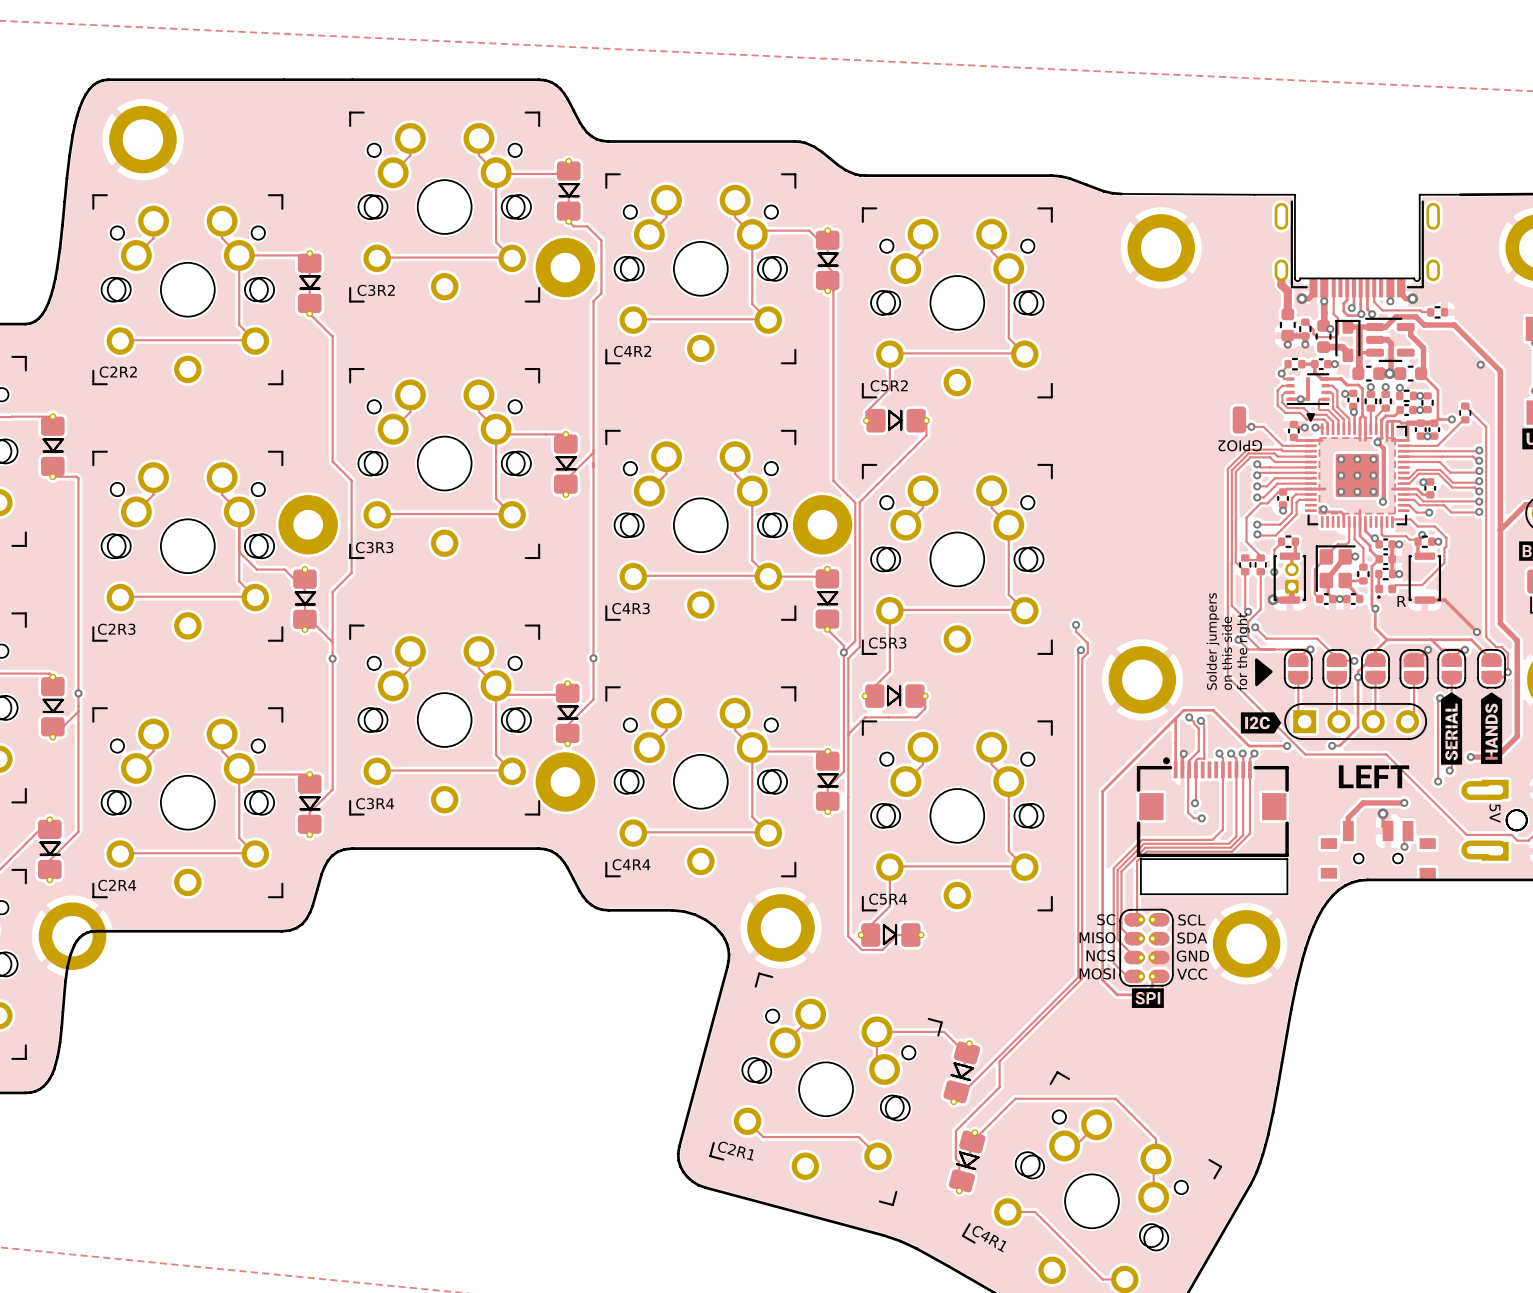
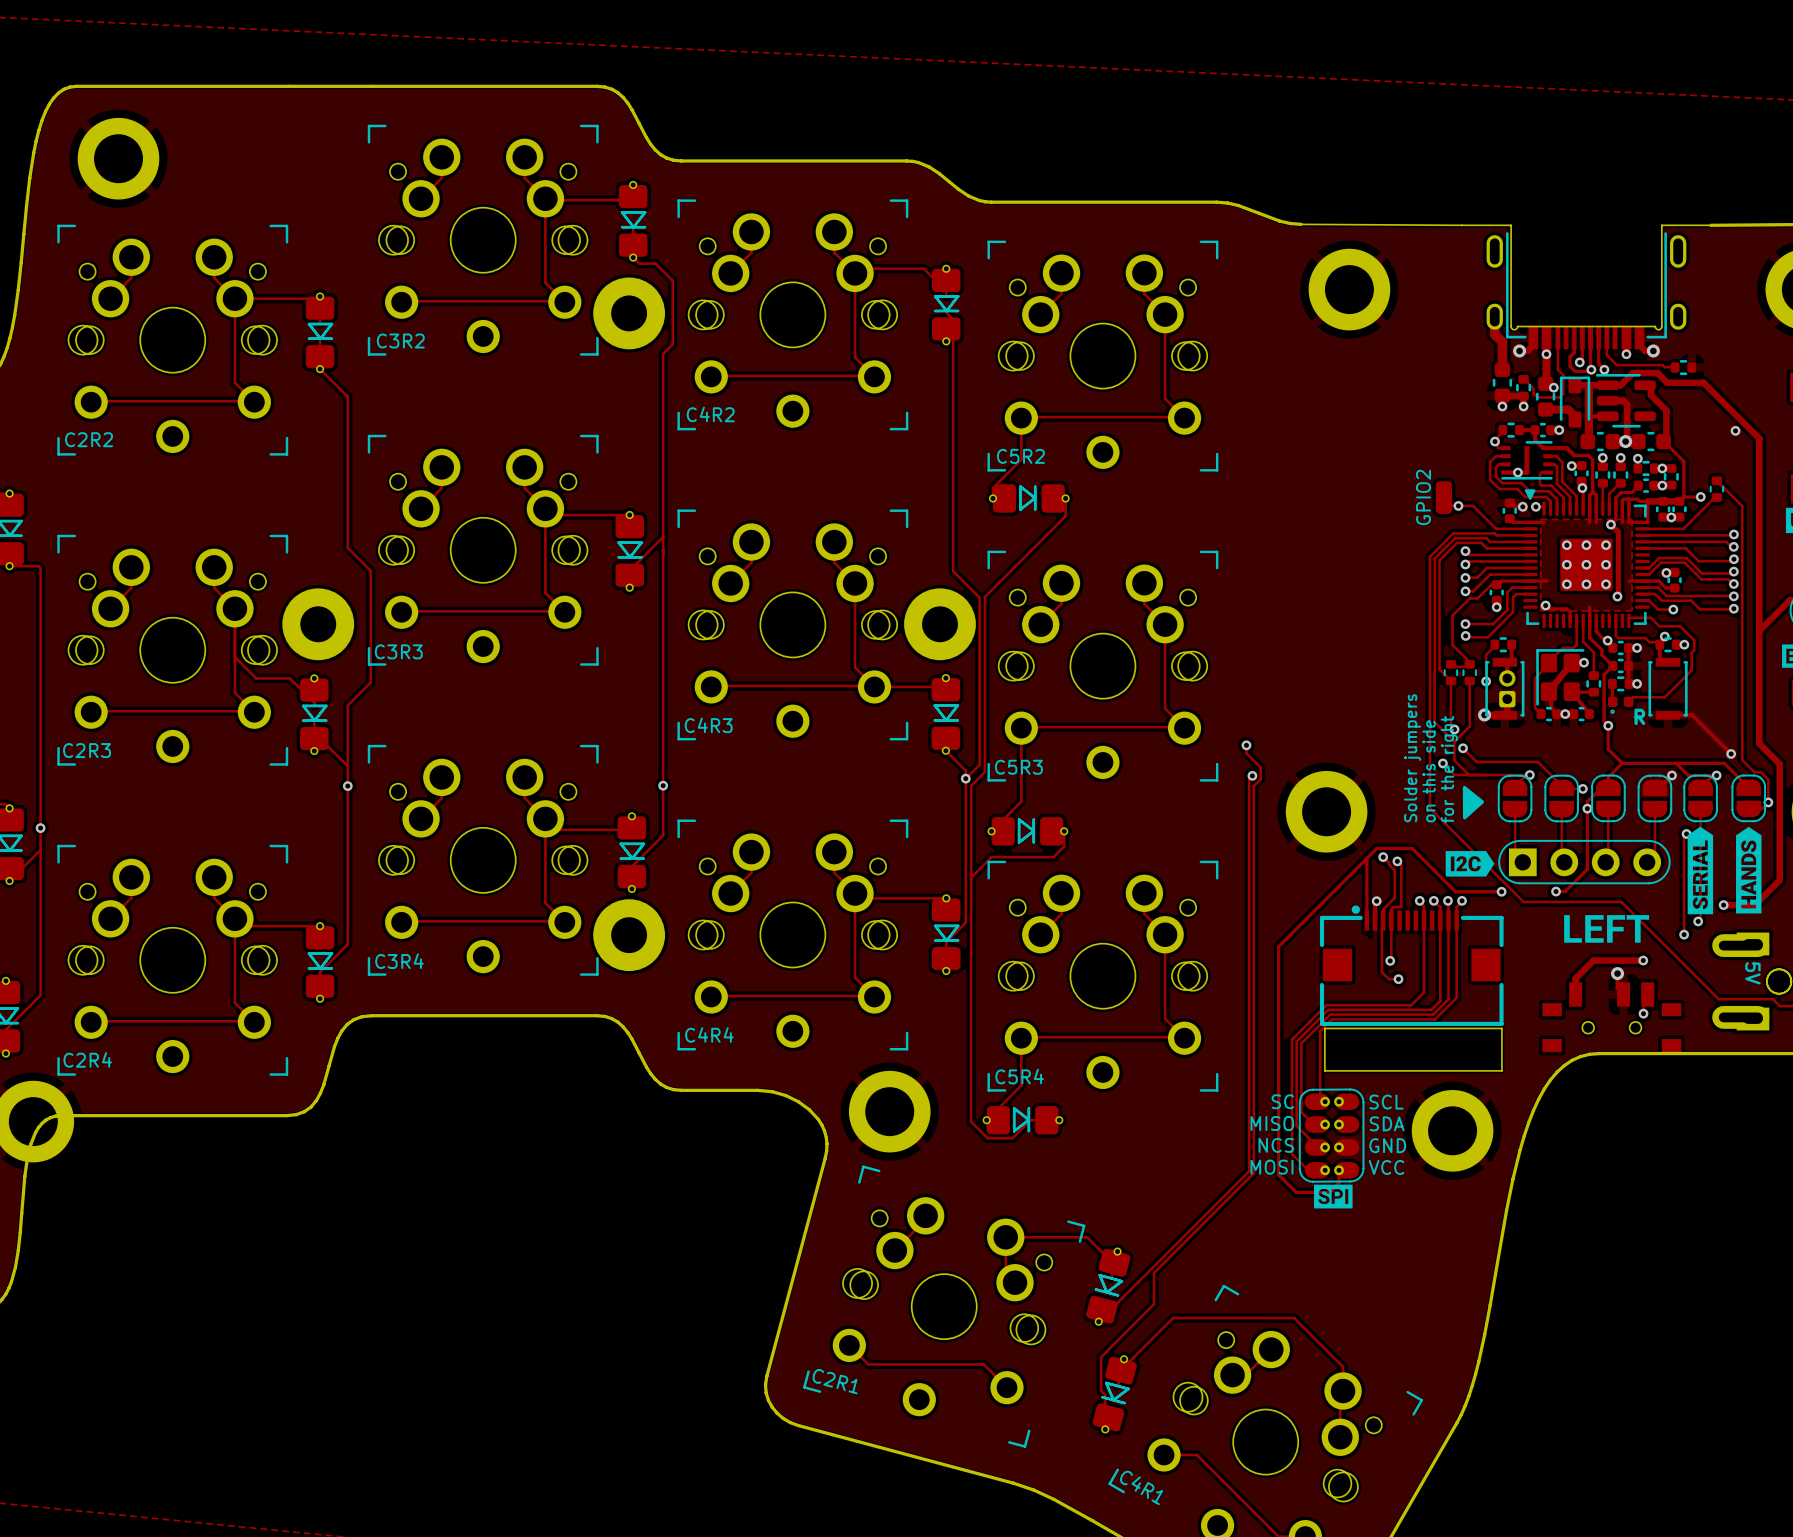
text rotation: 0° (1240, 445) -> 90° clockwise (1423, 497)

